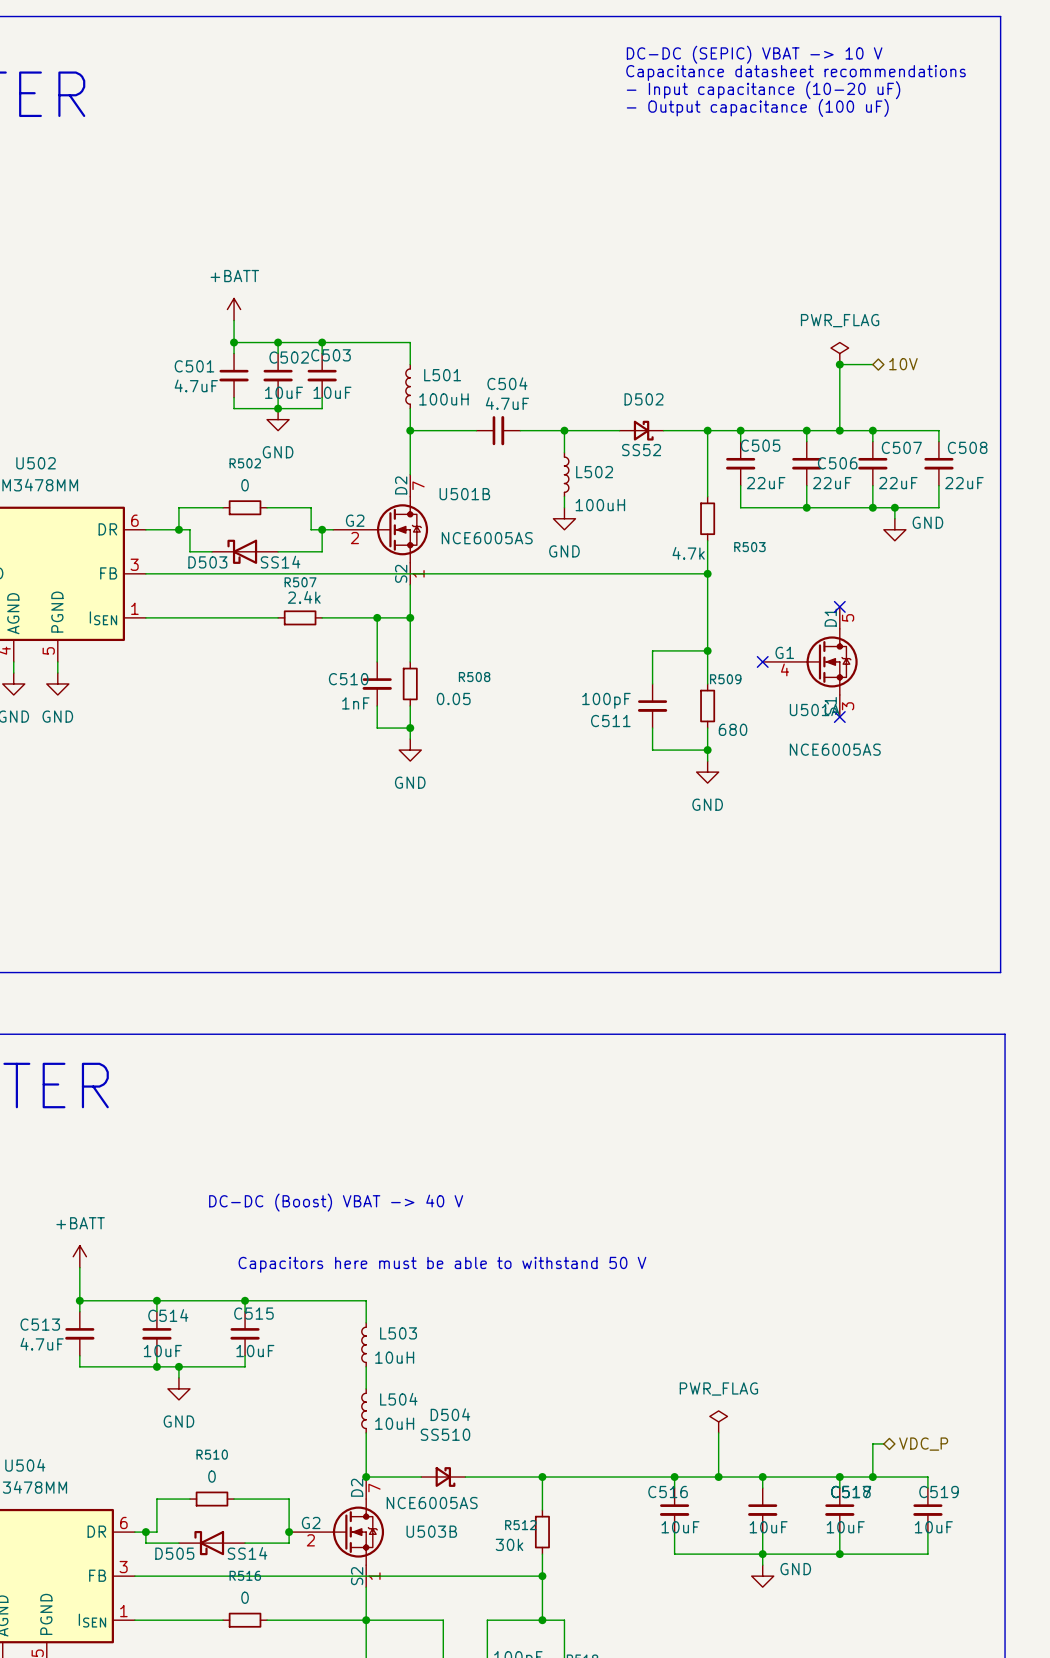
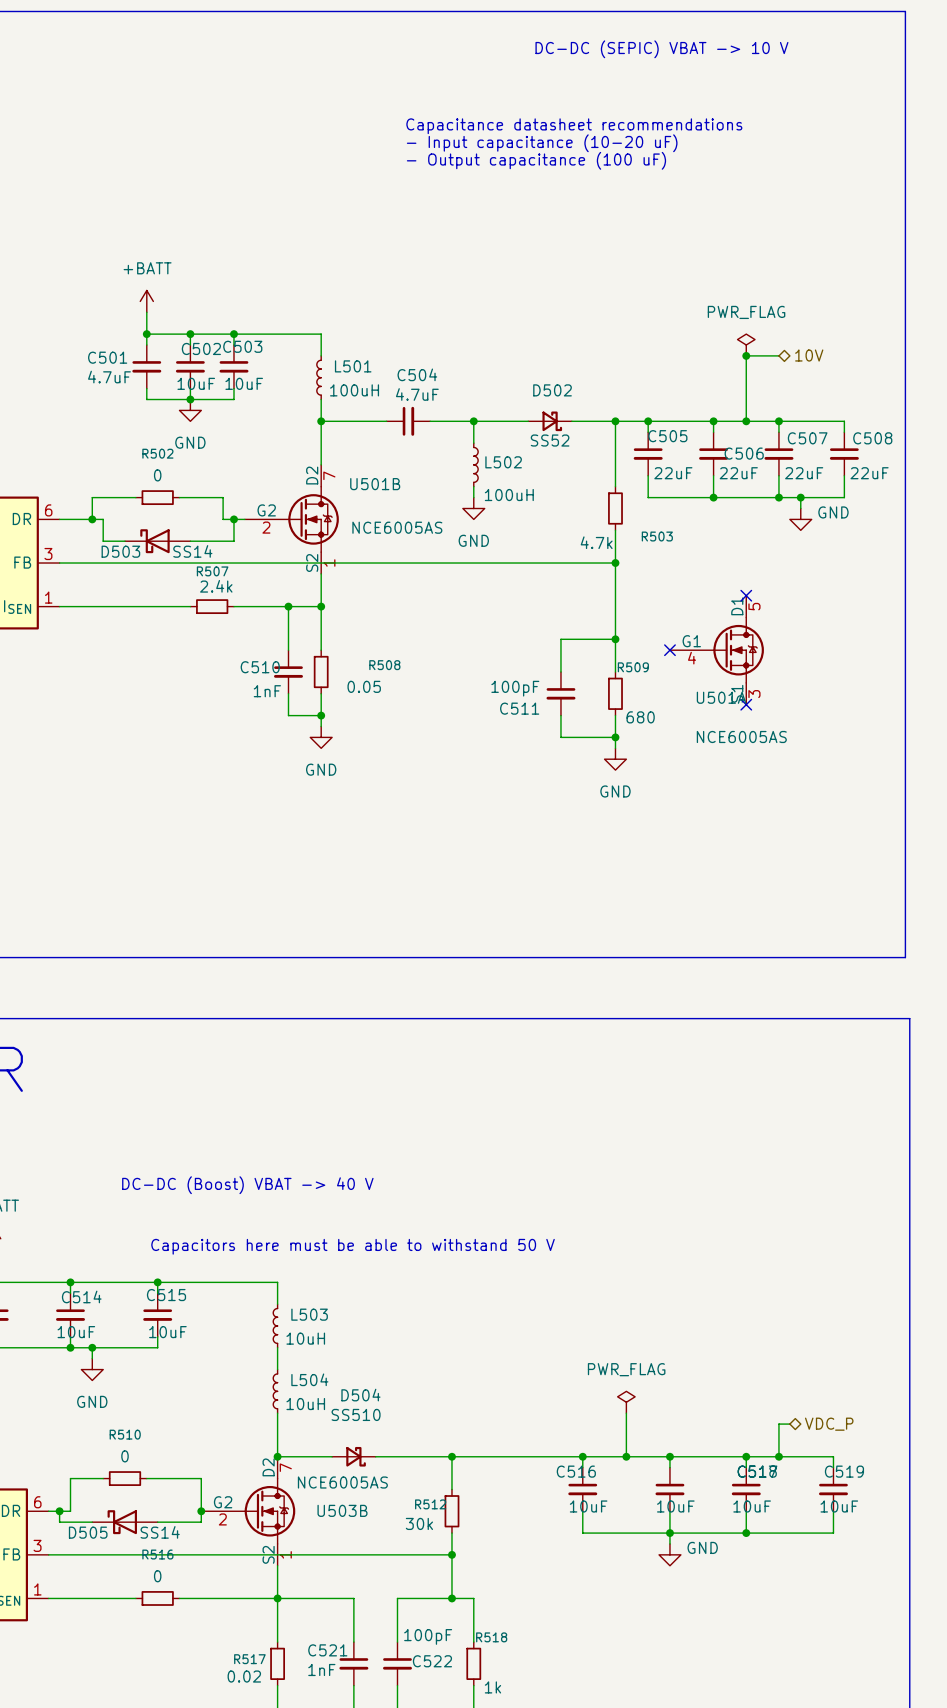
text position: Capacitance datasheet recommendations (796, 72) -> Capacitance datasheet recommendations (574, 126)
text position: - Input capacitance (10-20 uF) (763, 90) -> - Input capacitance (10-20 uF) (542, 143)
text position: - Output capacitance (100 uF) (757, 107) -> - Output capacitance (100 uF) (536, 160)

